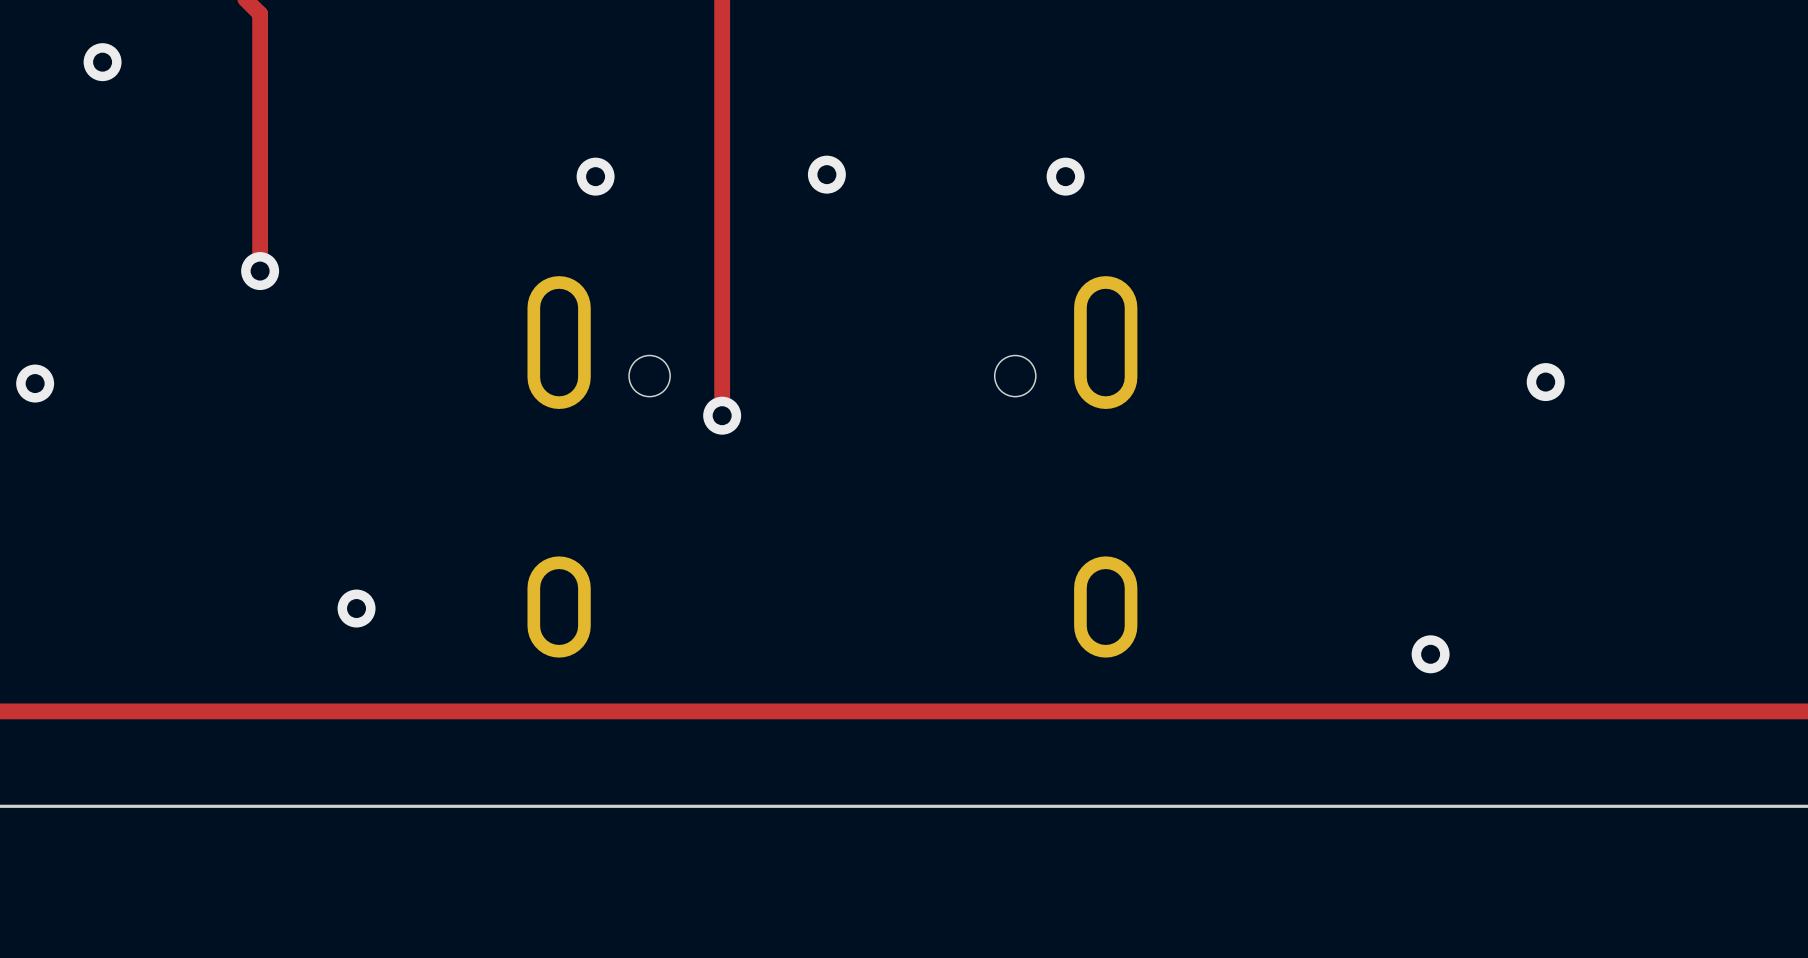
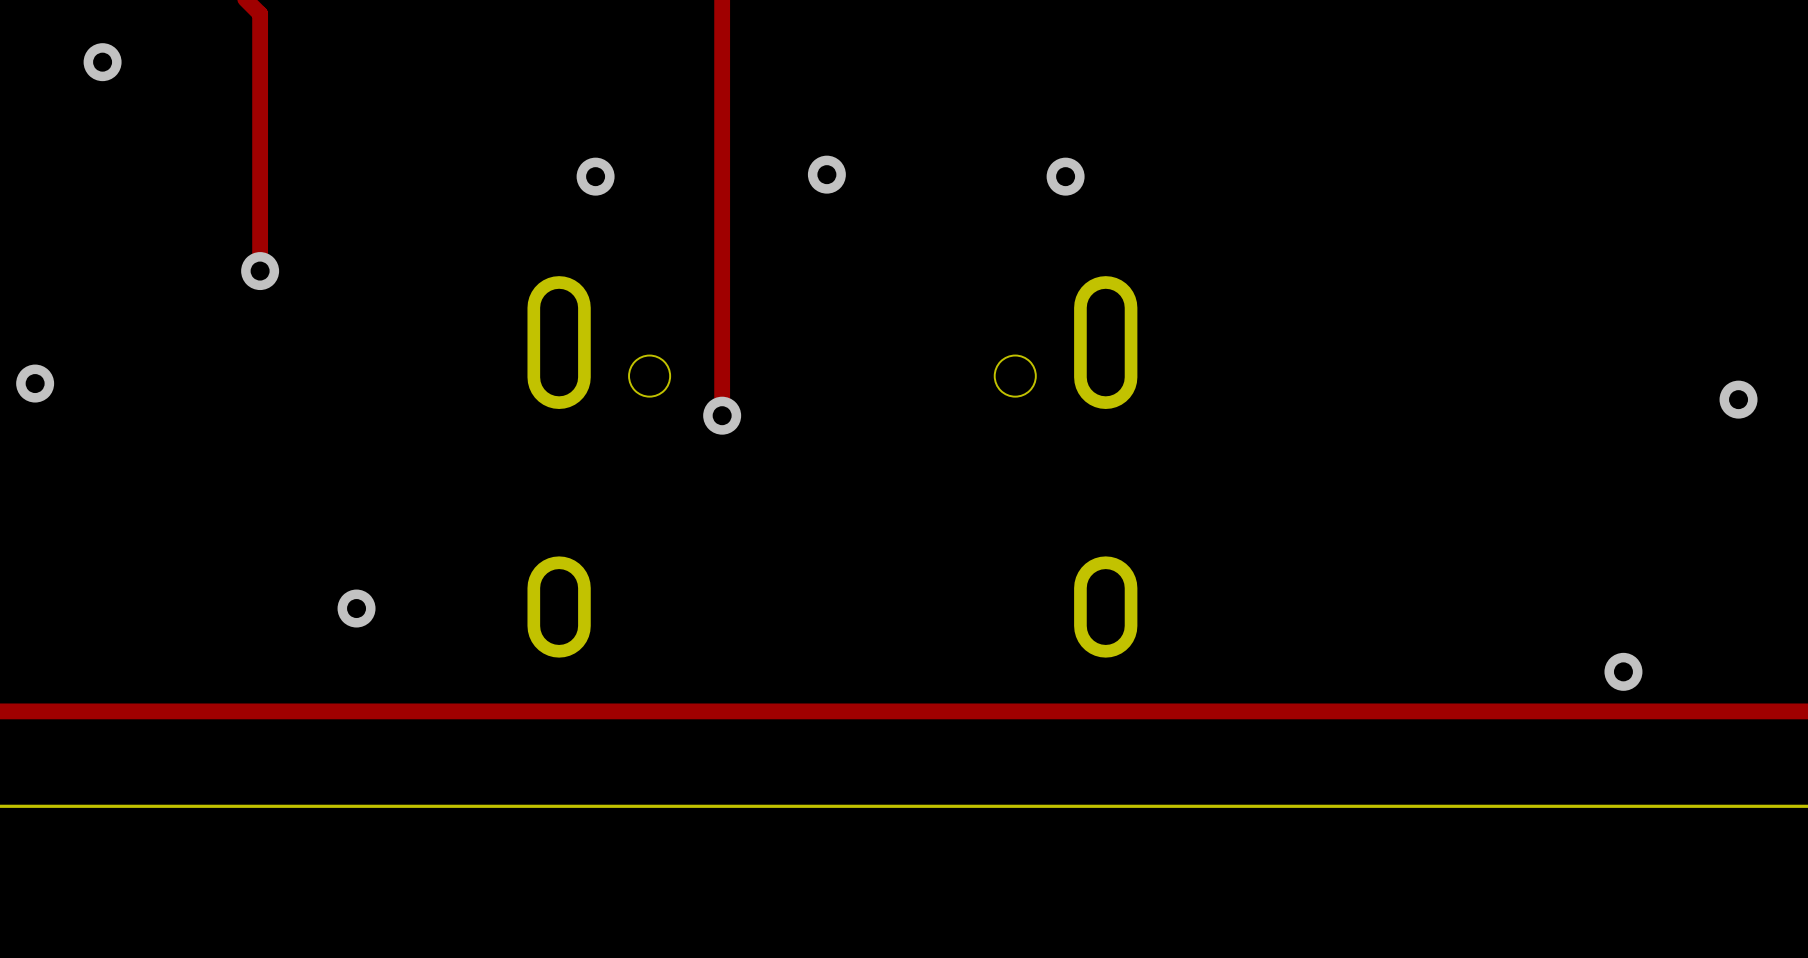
via: (1545, 382) -> none
via: none -> (1738, 399)
via: (1430, 654) -> none
via: none -> (1623, 671)

